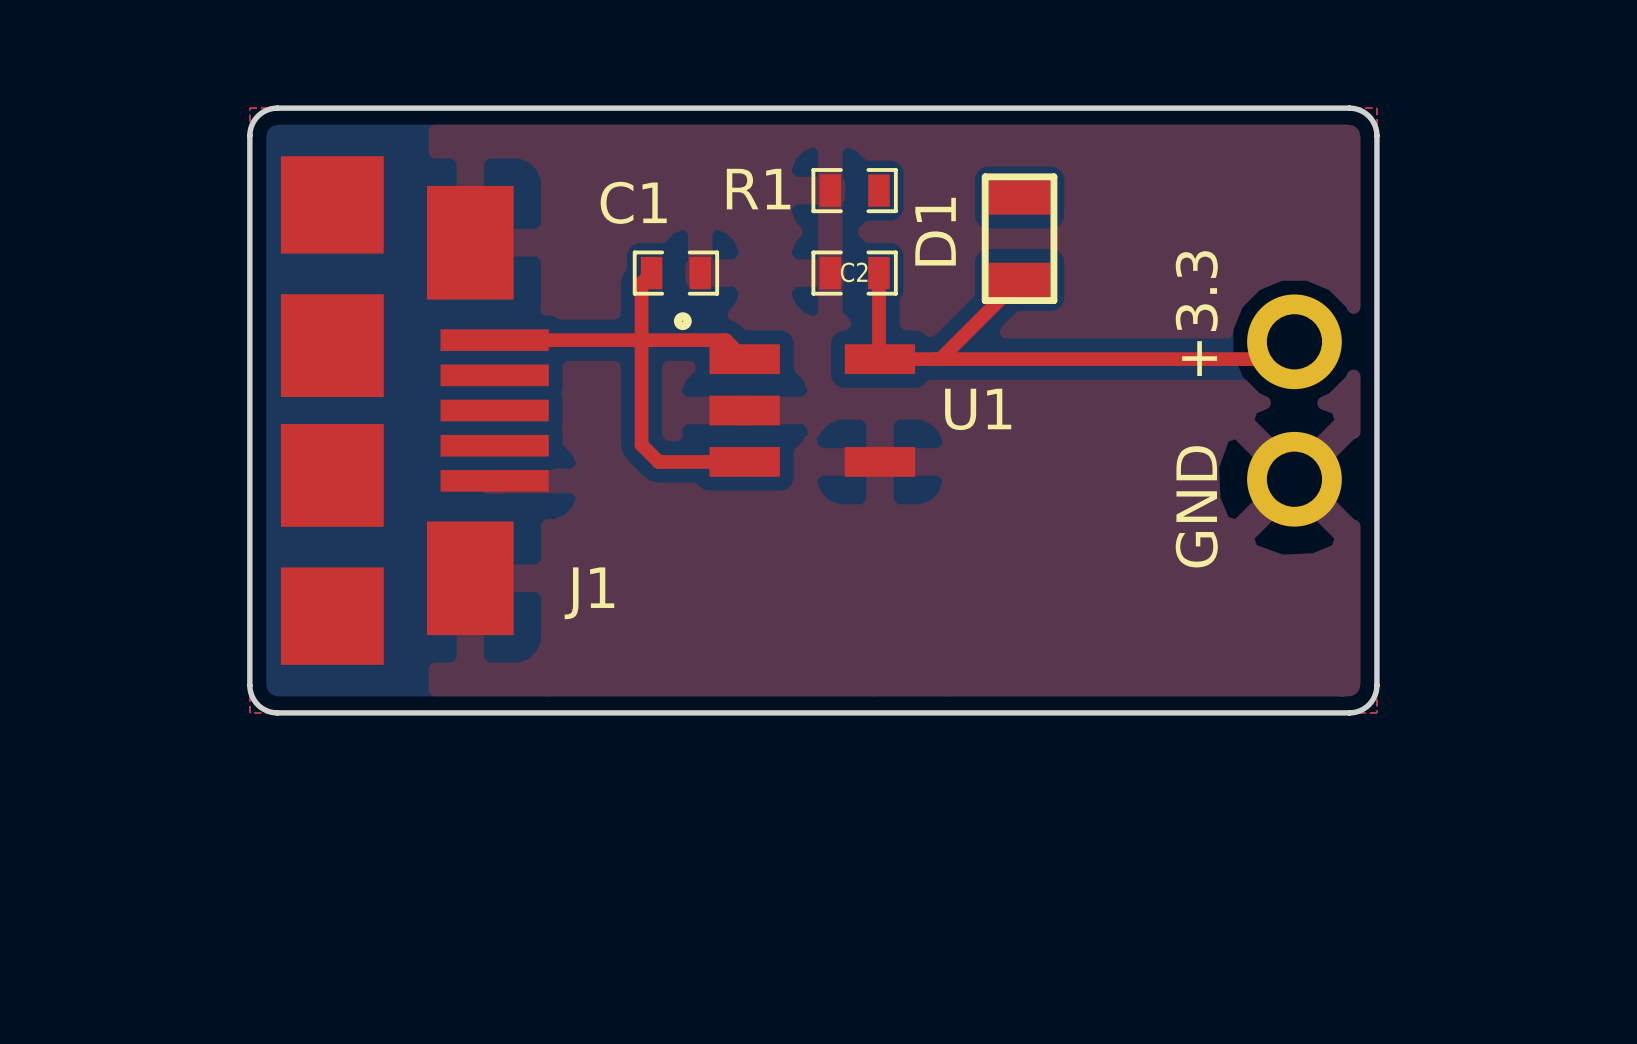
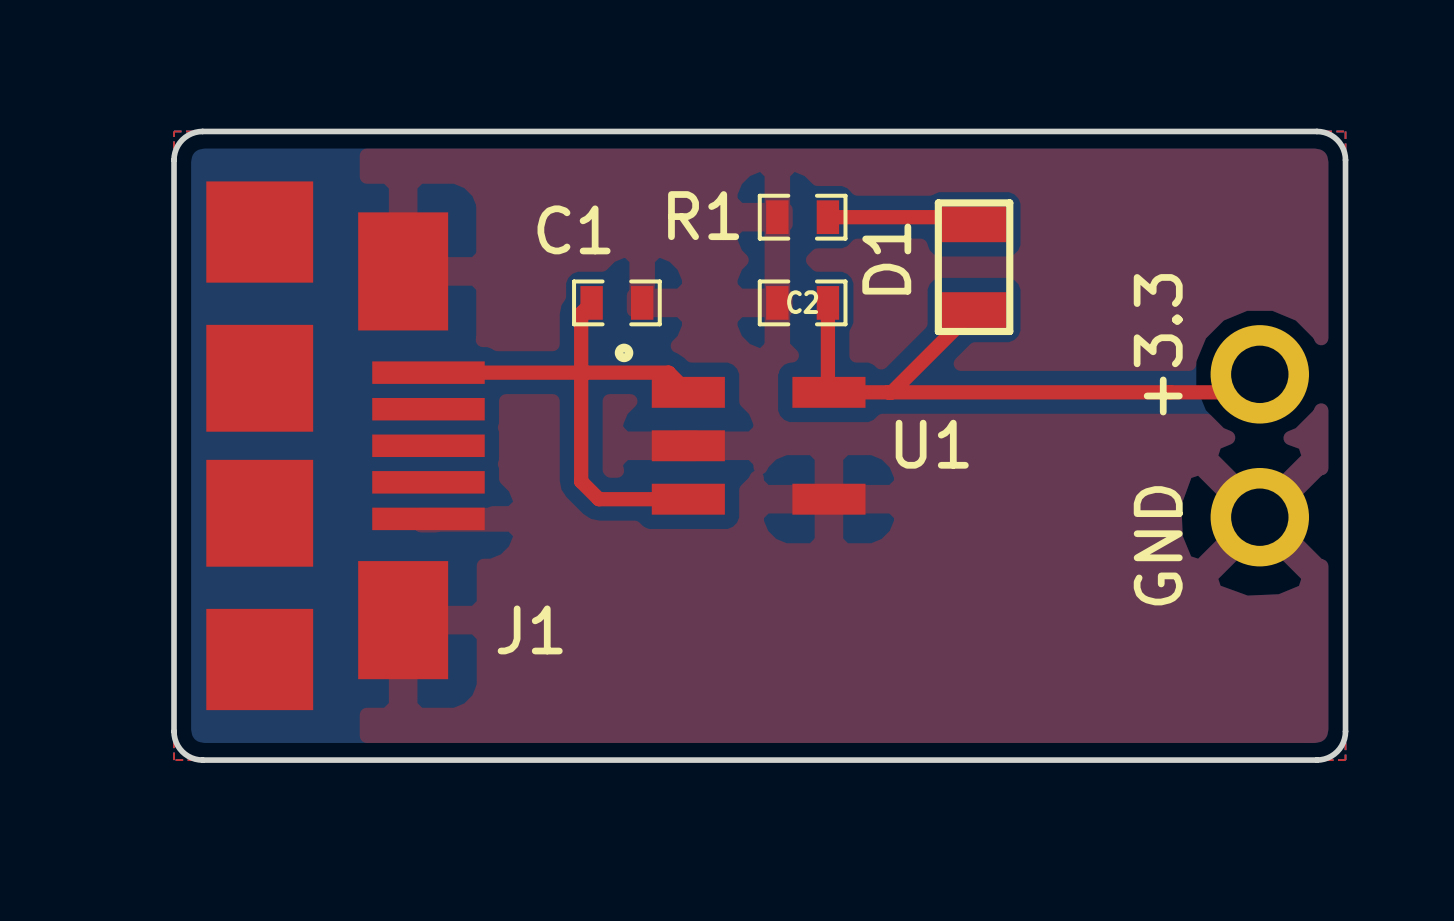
top track: none -> (827, 217) (966, 217) (974, 224)

